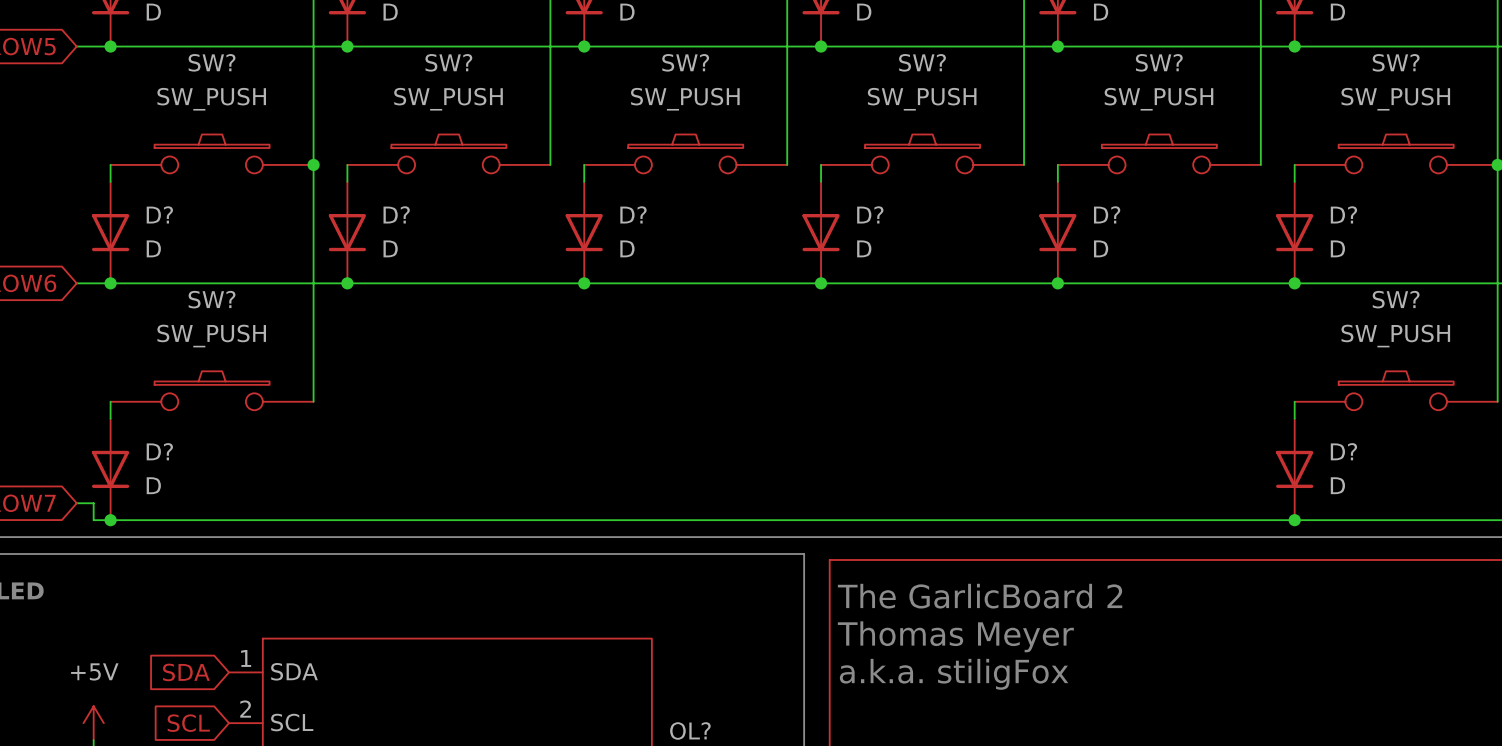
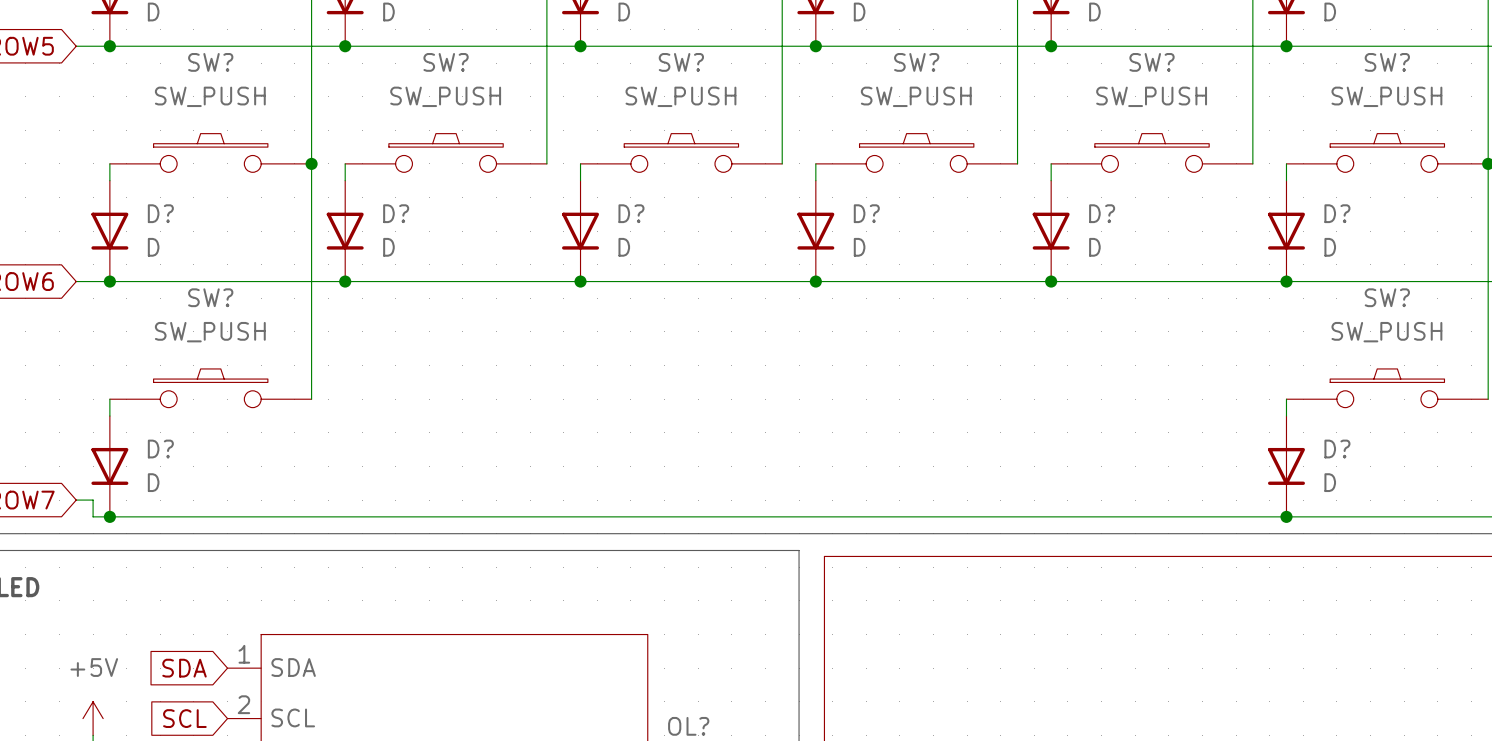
text: The GarlicBoard 2 (980, 596) -> none
text: Thomas Meyer (955, 636) -> none
text: a.k.a. stiligFox (954, 674) -> none

